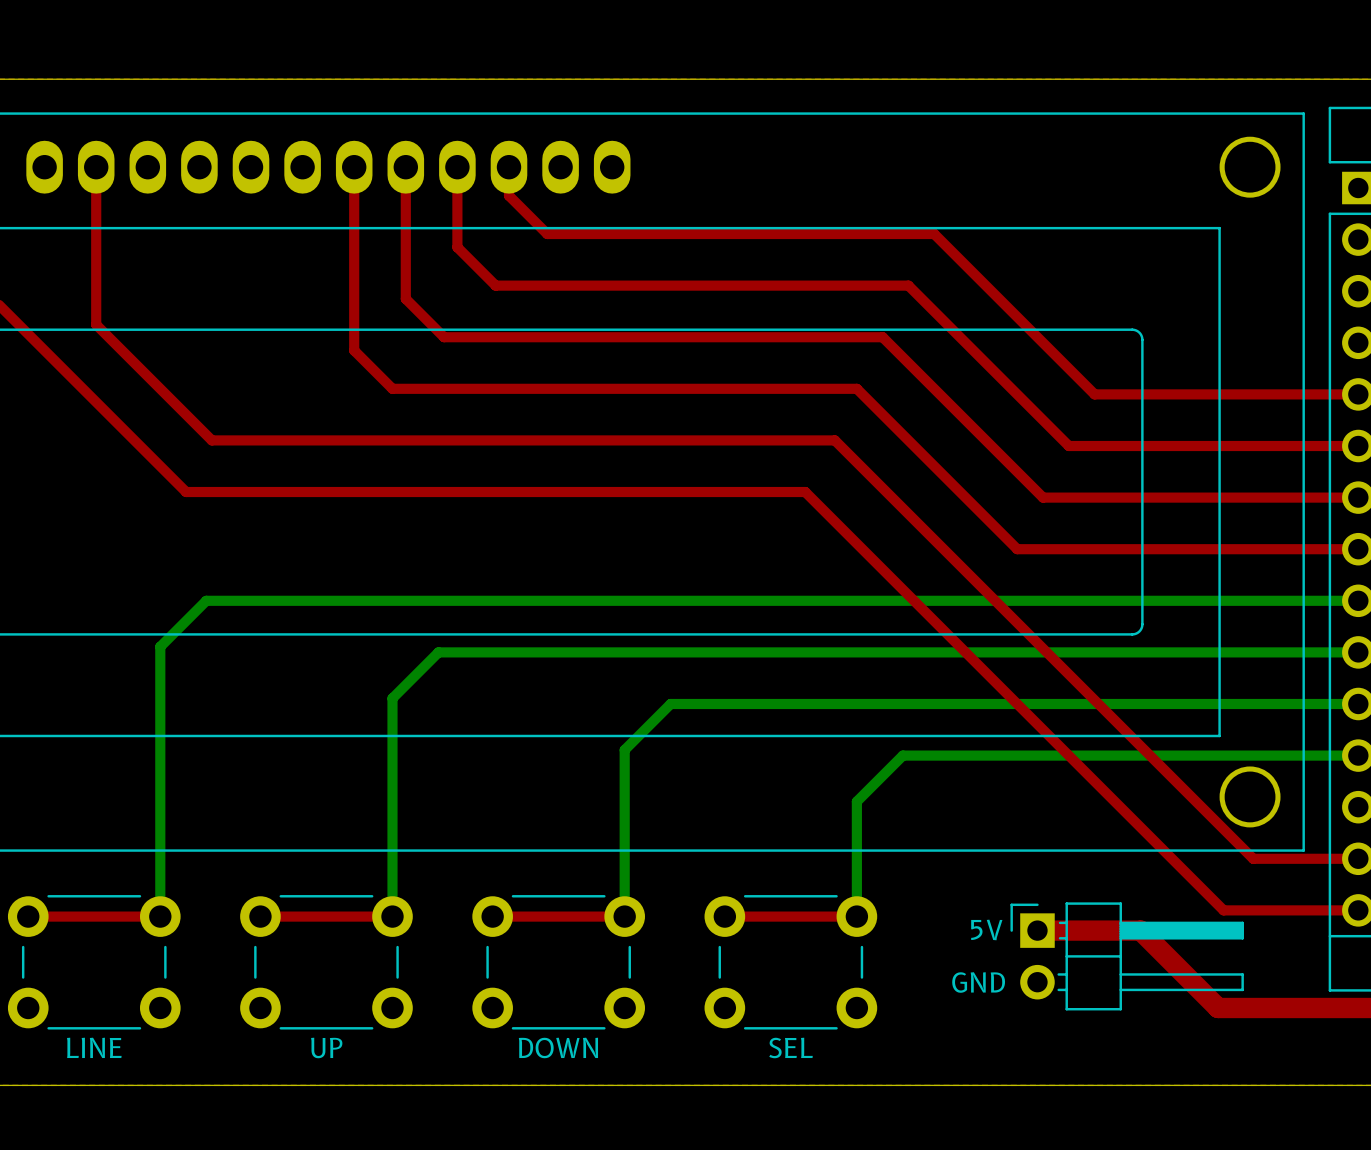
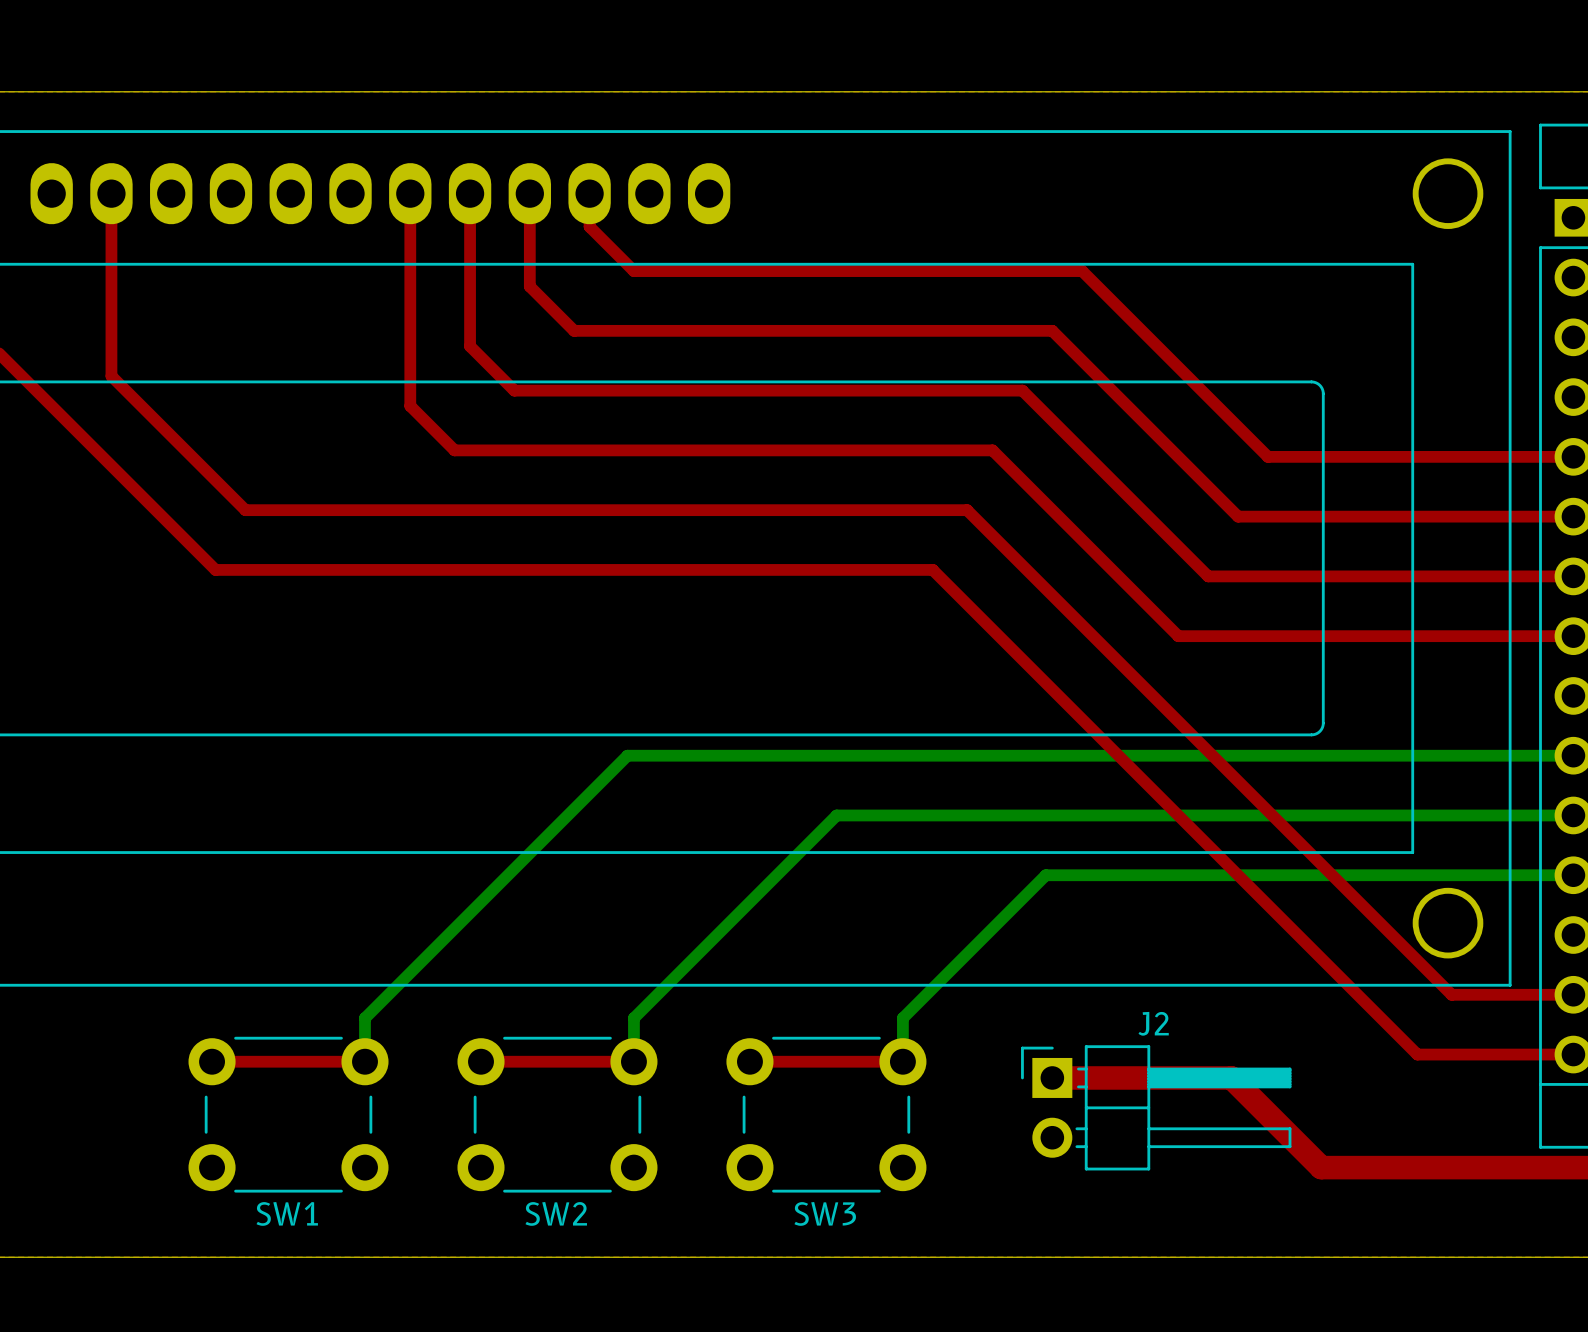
bottom track: (1358, 600) (206, 600) (160, 646) (160, 916) -> none
bottom track: (541, 652) (438, 652) (392, 698) (392, 916) -> (627, 755) (364, 1018) (364, 1077)
bottom track: (722, 703) (670, 703) (624, 750) (624, 916) -> (836, 815) (633, 1018) (633, 1061)
bottom track: (856, 801) (856, 916) -> (992, 928) (902, 1018) (902, 1061)
top track: (28, 916) (160, 916) -> none
top track: (315, 916) (392, 916) -> (212, 1061) (301, 1061)
top track: (547, 916) (624, 916) -> (481, 1061) (570, 1061)
top track: (779, 916) (856, 916) -> (749, 1061) (839, 1061)
top track: none -> (1052, 1077) (1201, 1077)
top track: (1063, 930) (1140, 930) (1218, 1007) -> (1231, 1077) (1321, 1167) (1410, 1167)
J2: none -> (1156, 1107)
5V: (1127, 956) -> none
LINE: (94, 962) -> none
SW1: none -> (288, 1114)
UP: (326, 962) -> none
SW2: none -> (557, 1114)
DOWN: (558, 962) -> none
SW3: none -> (826, 1114)
SEL: (790, 962) -> none
text: GND (978, 982) -> none

